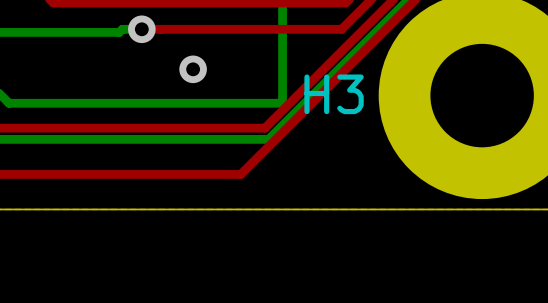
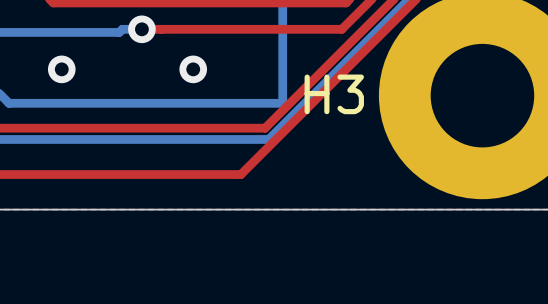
via: none -> (61, 69)

